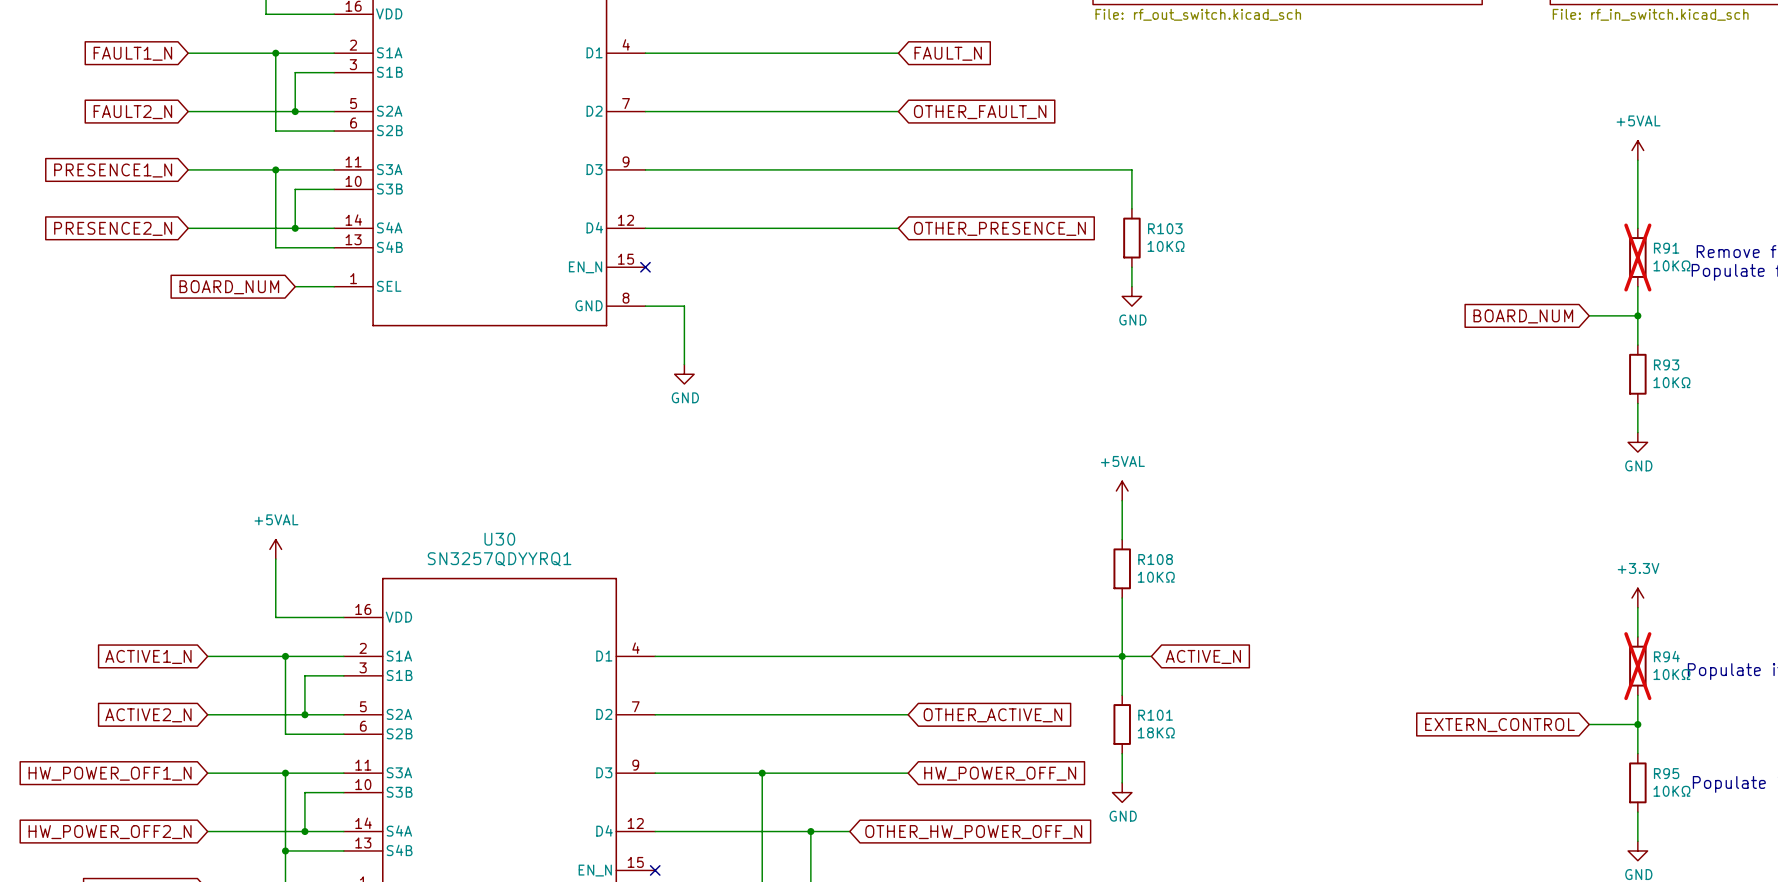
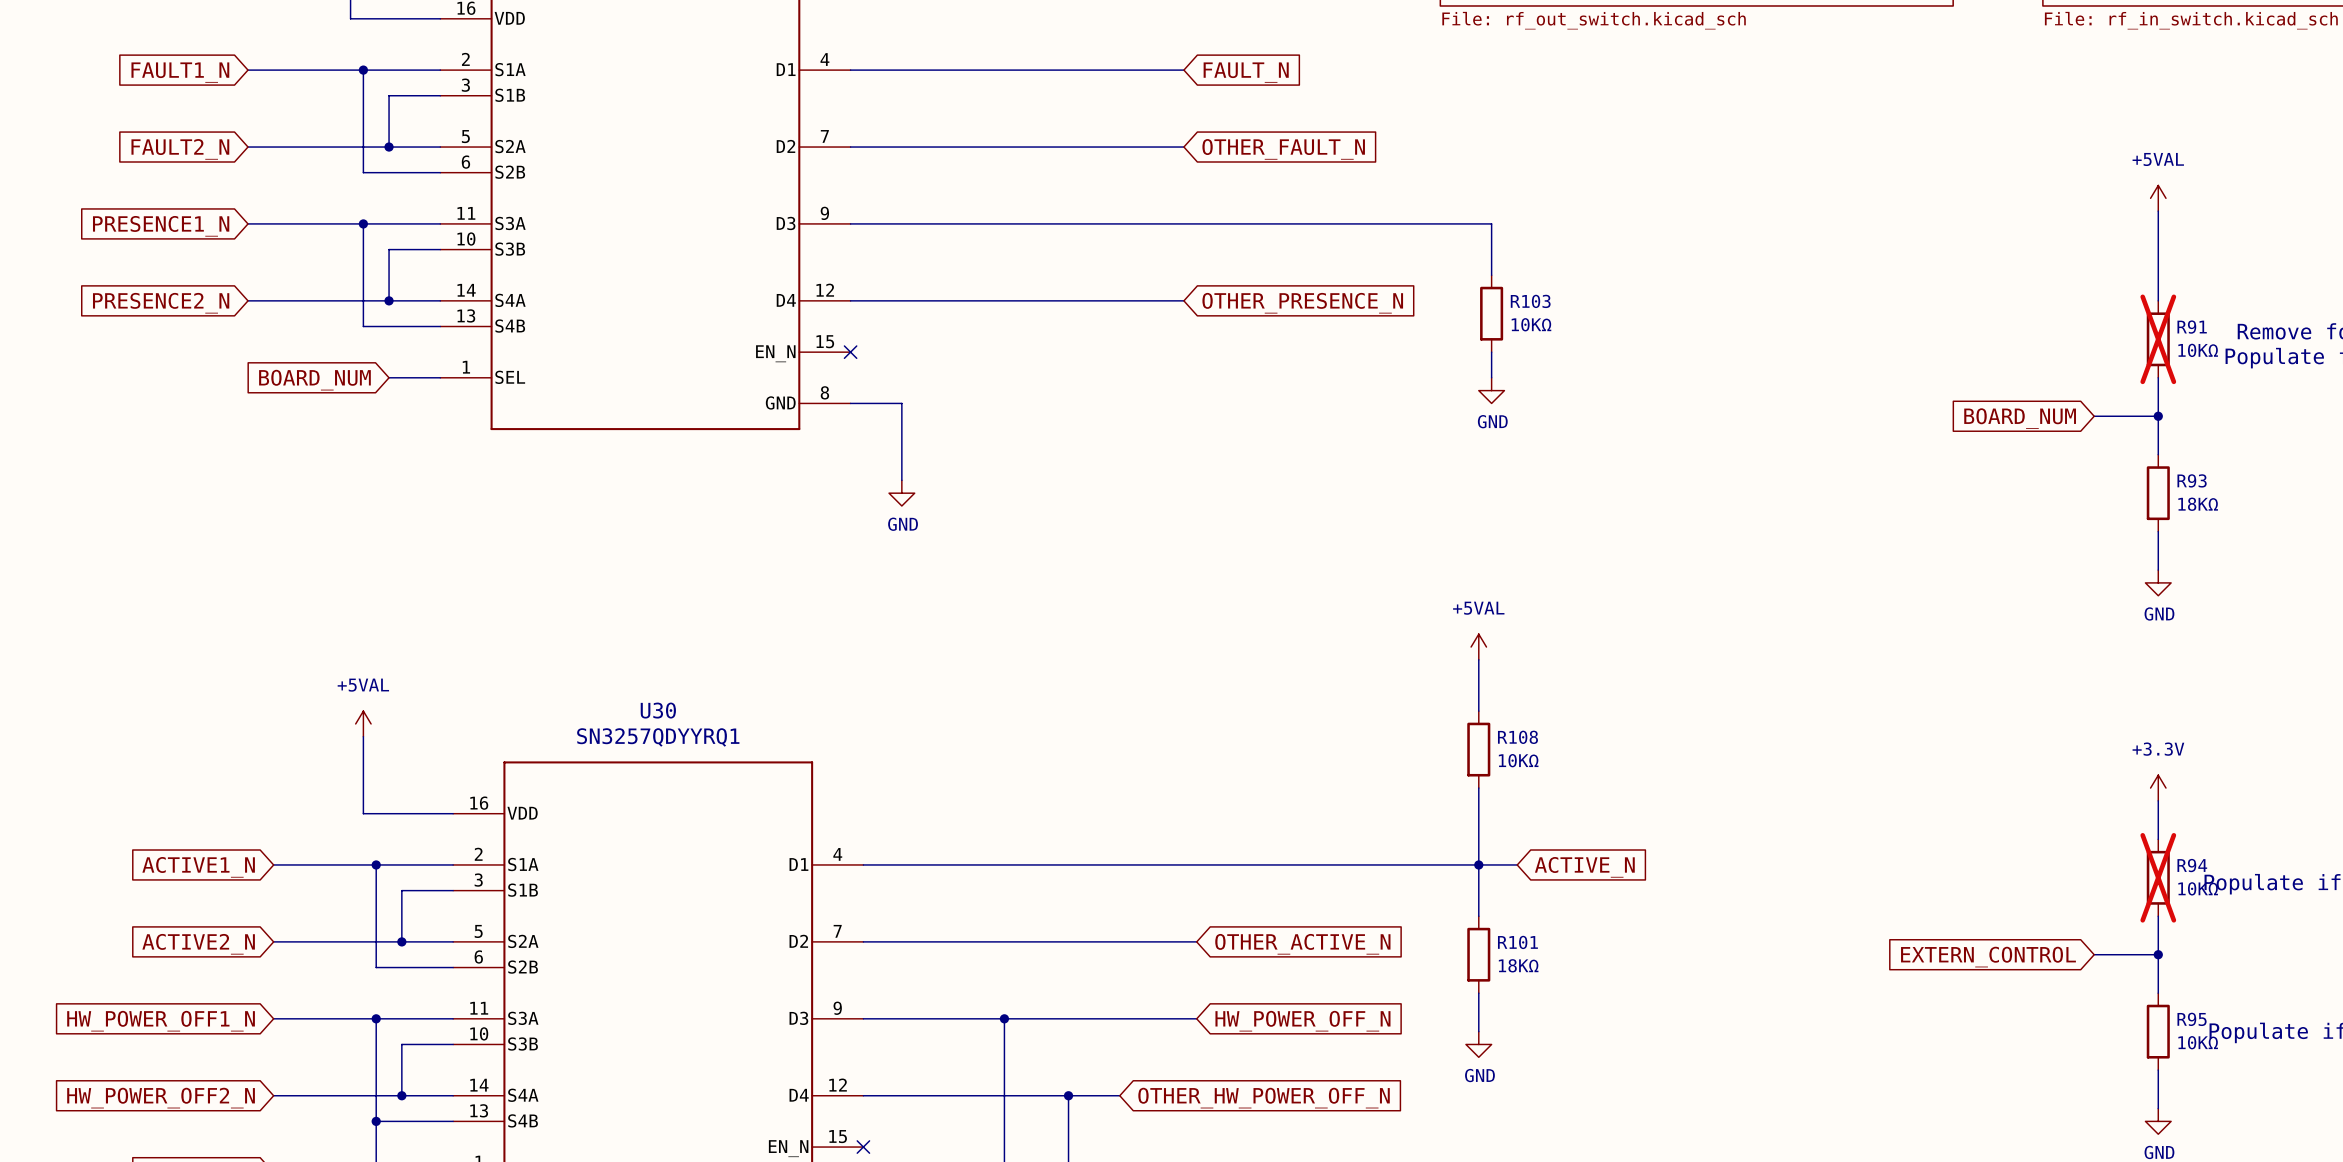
R93 value: 10KΩ (1671, 382) -> 18KΩ (2198, 504)

